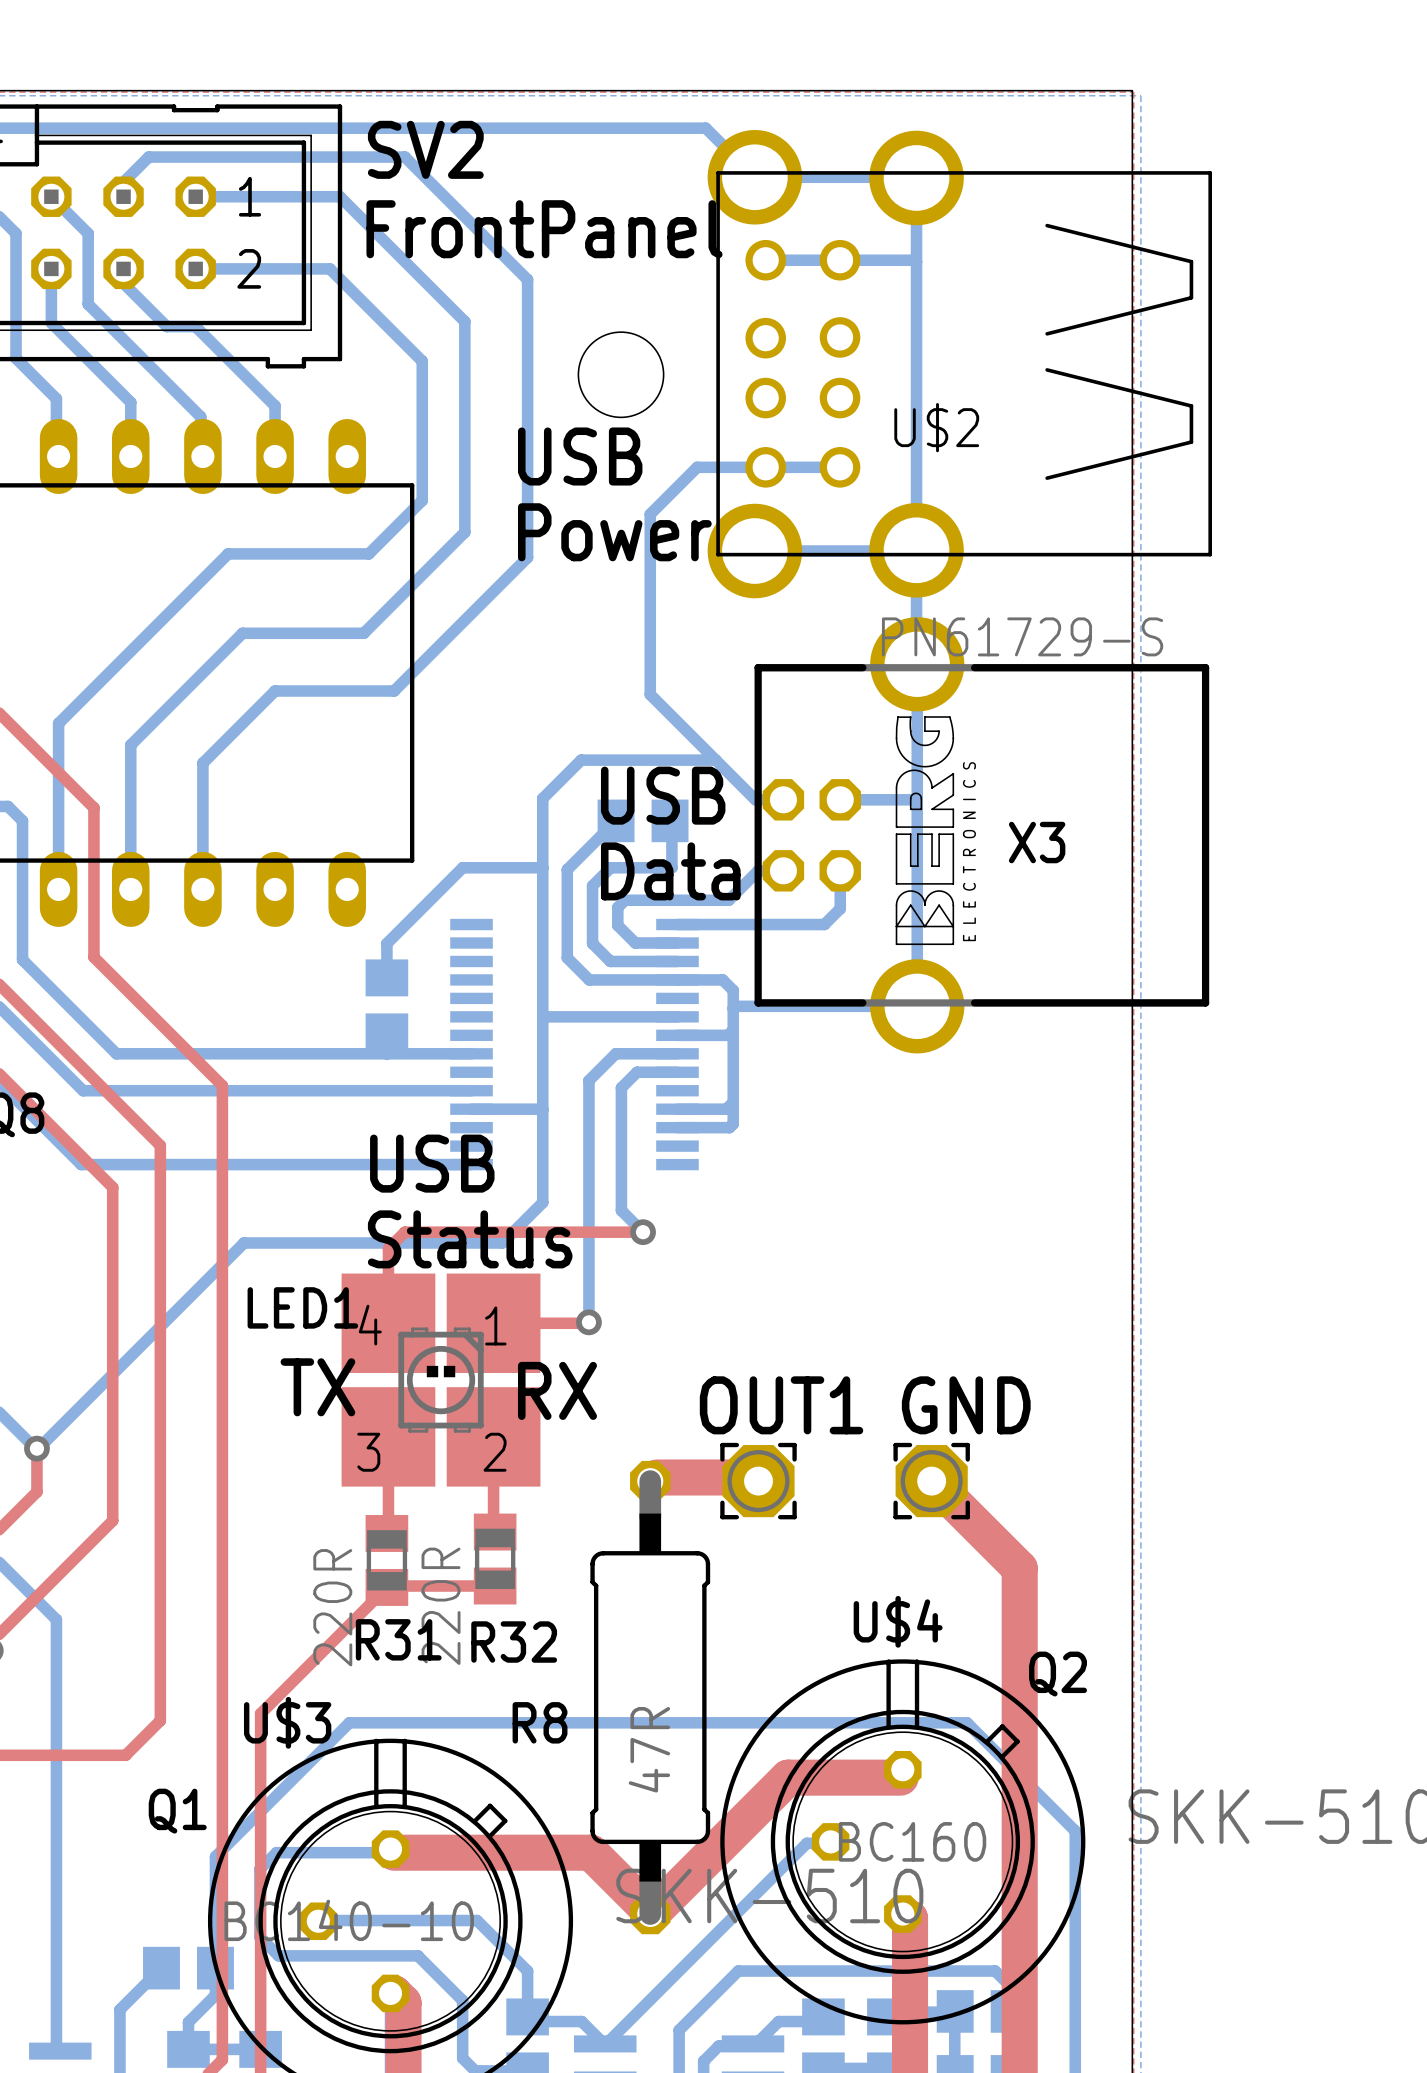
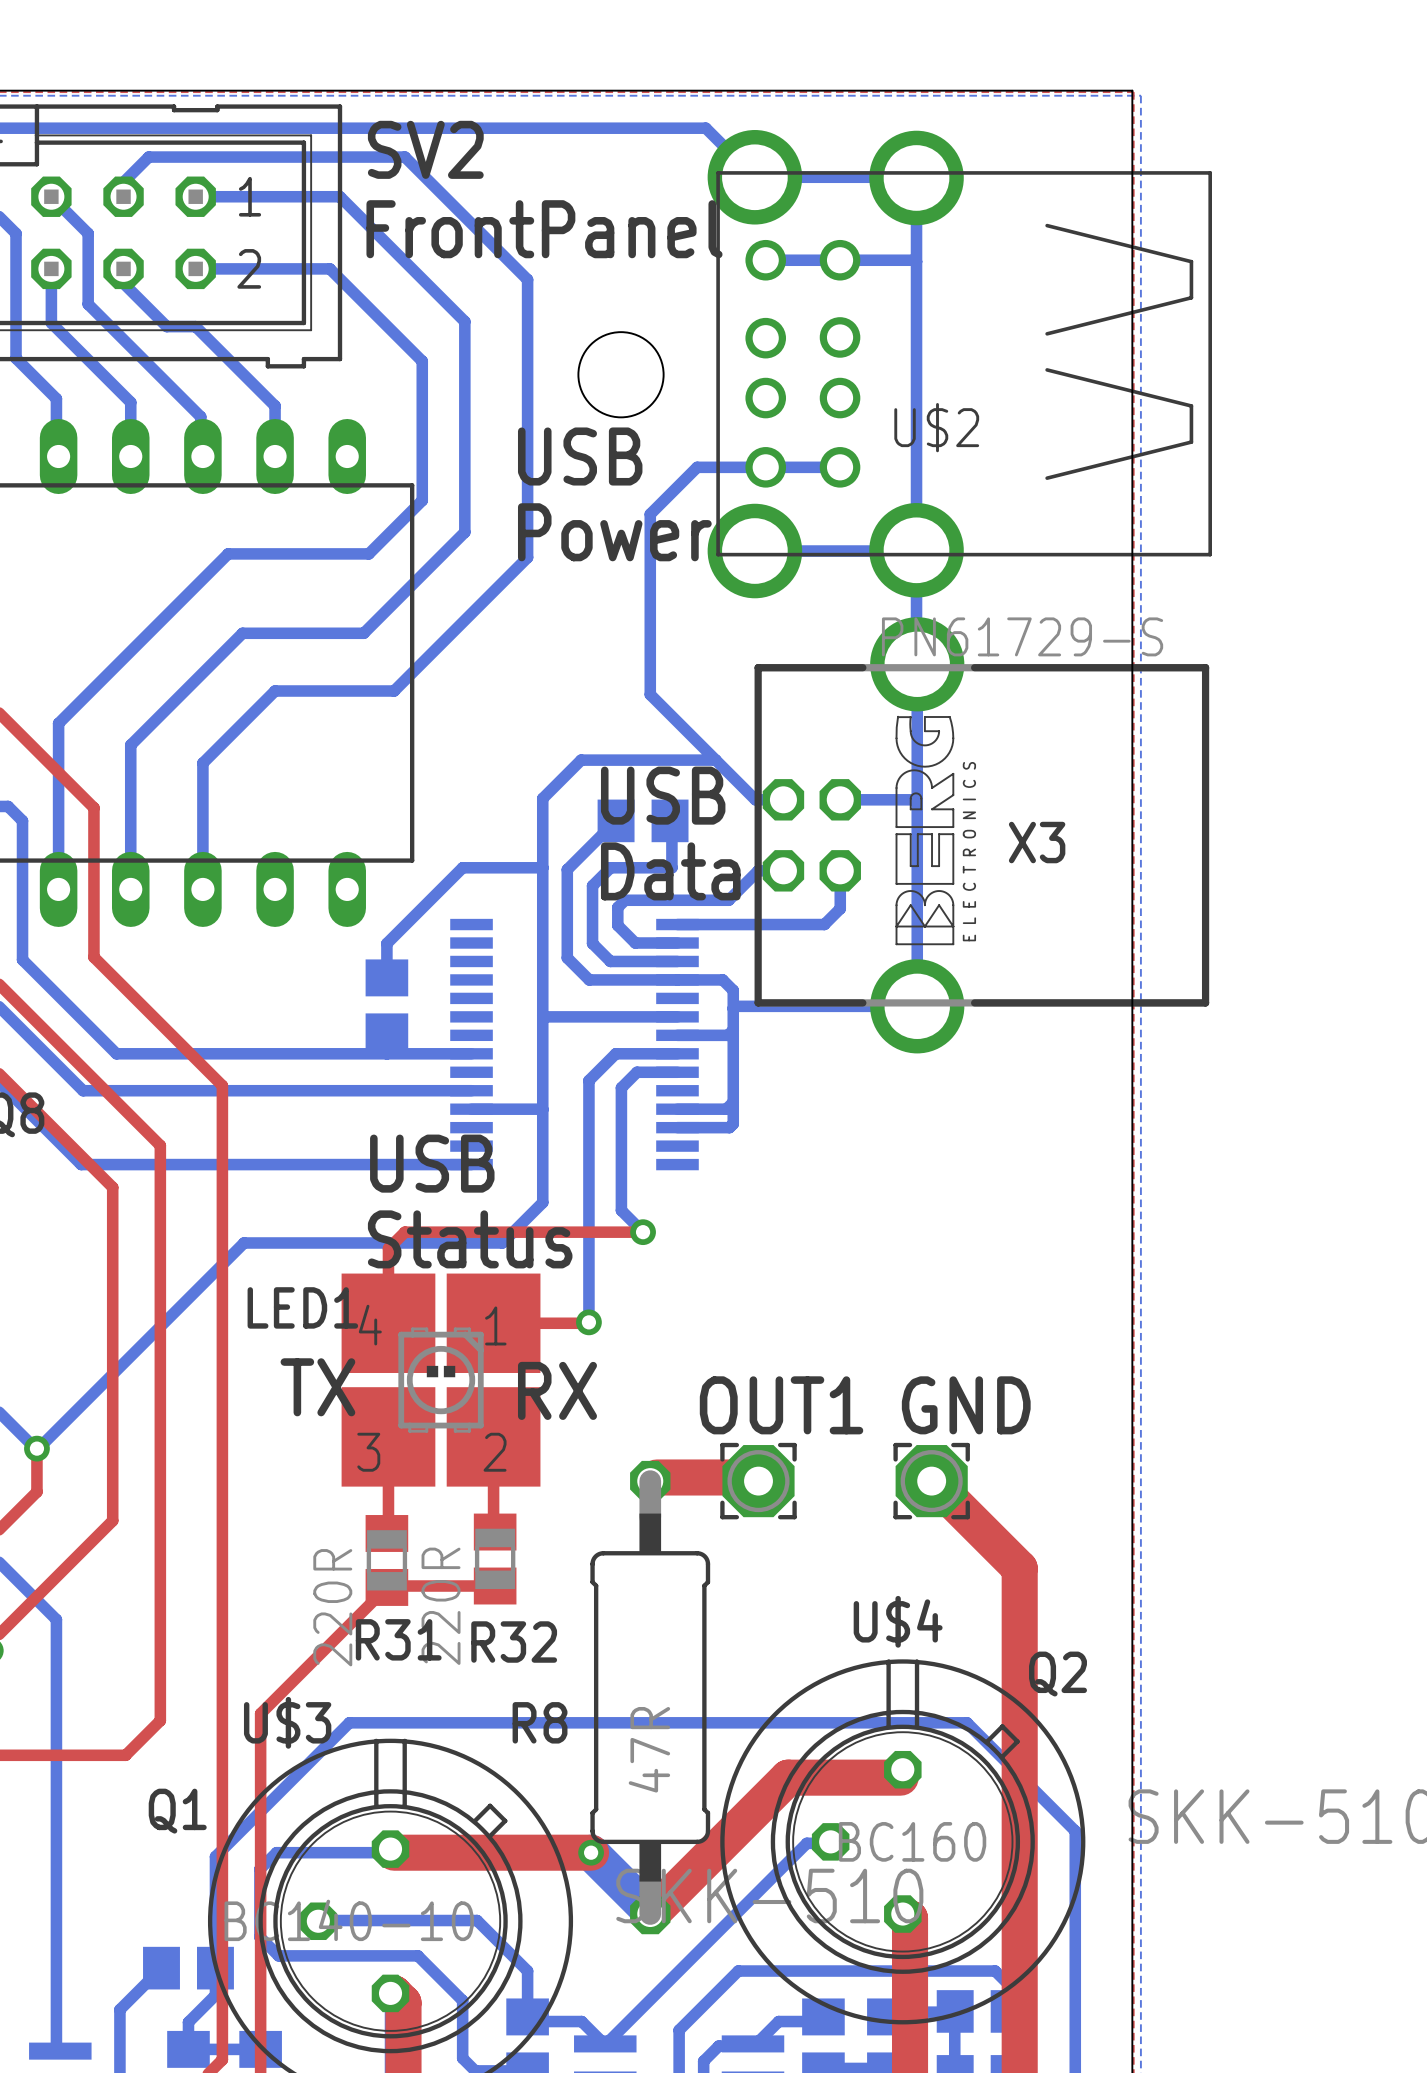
bottom track: none -> (591, 1852) (647, 1908)
top track: (591, 1852) (647, 1908) -> none
via: none -> (591, 1852)

